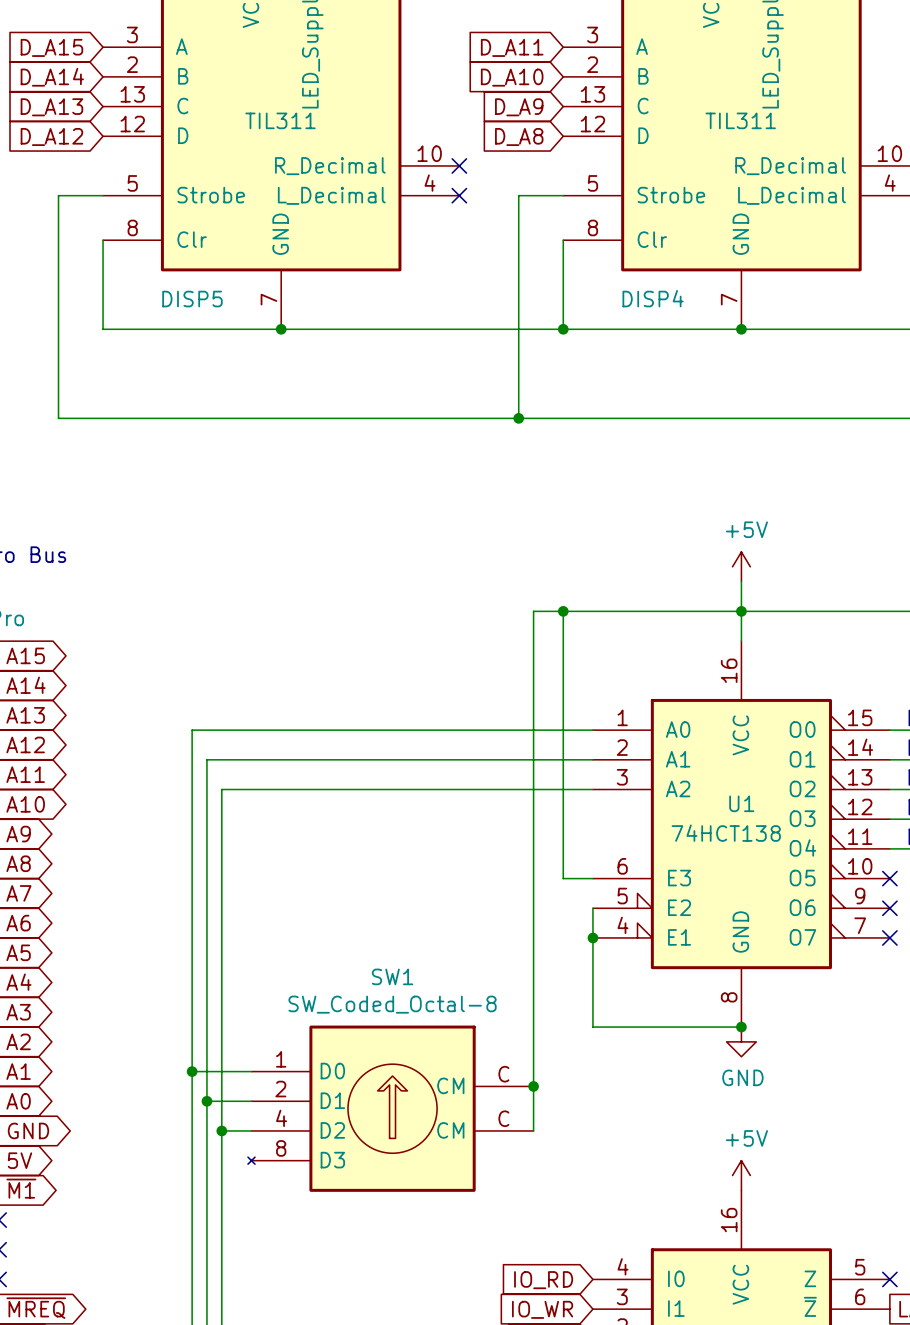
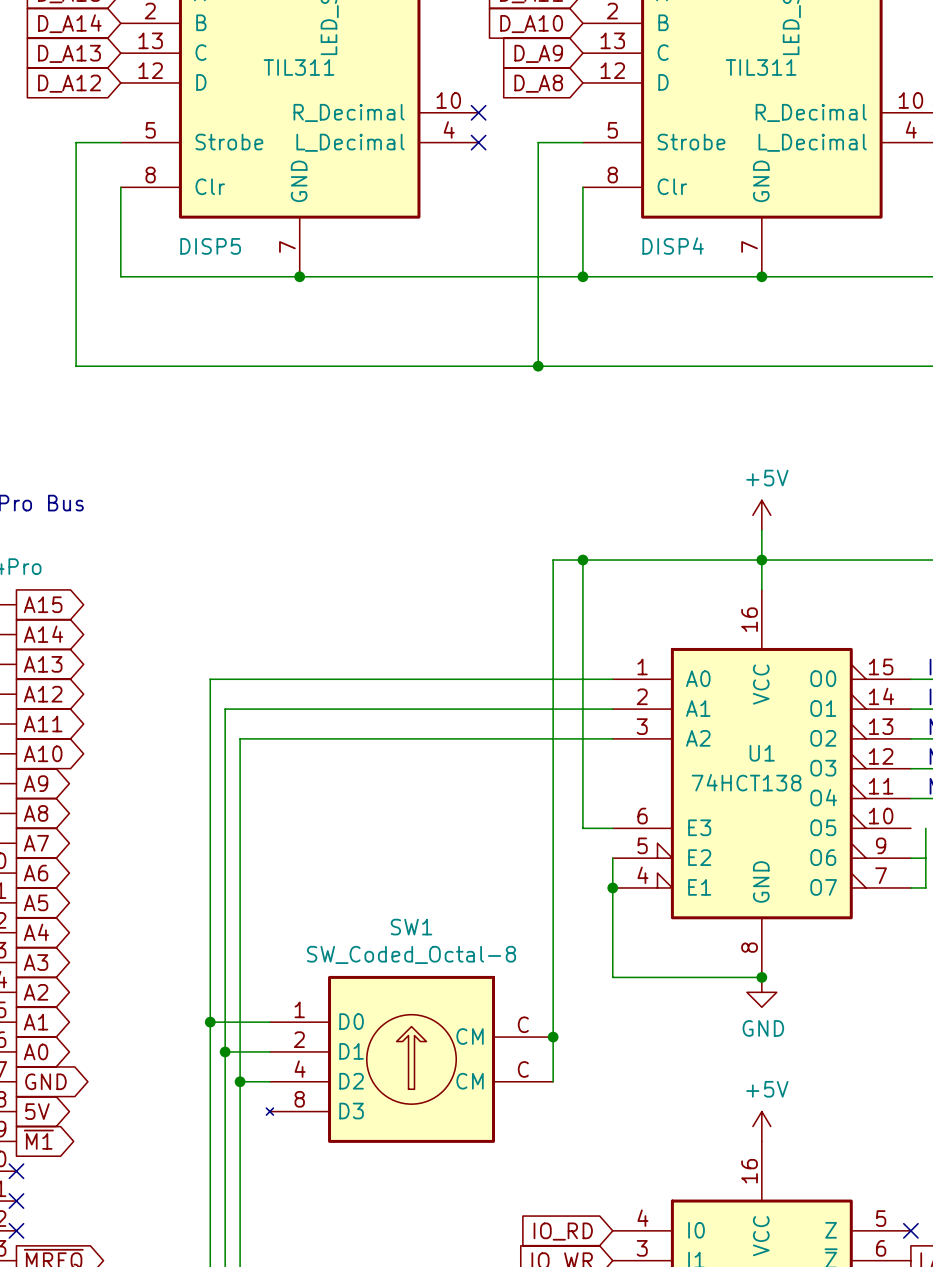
no-connect mark: (889, 878) -> none
wire: none -> (925, 828) (925, 887) (910, 887)
wire: none -> (910, 858) (925, 858)
no-connect mark: (889, 908) -> none
no-connect mark: (889, 937) -> none

